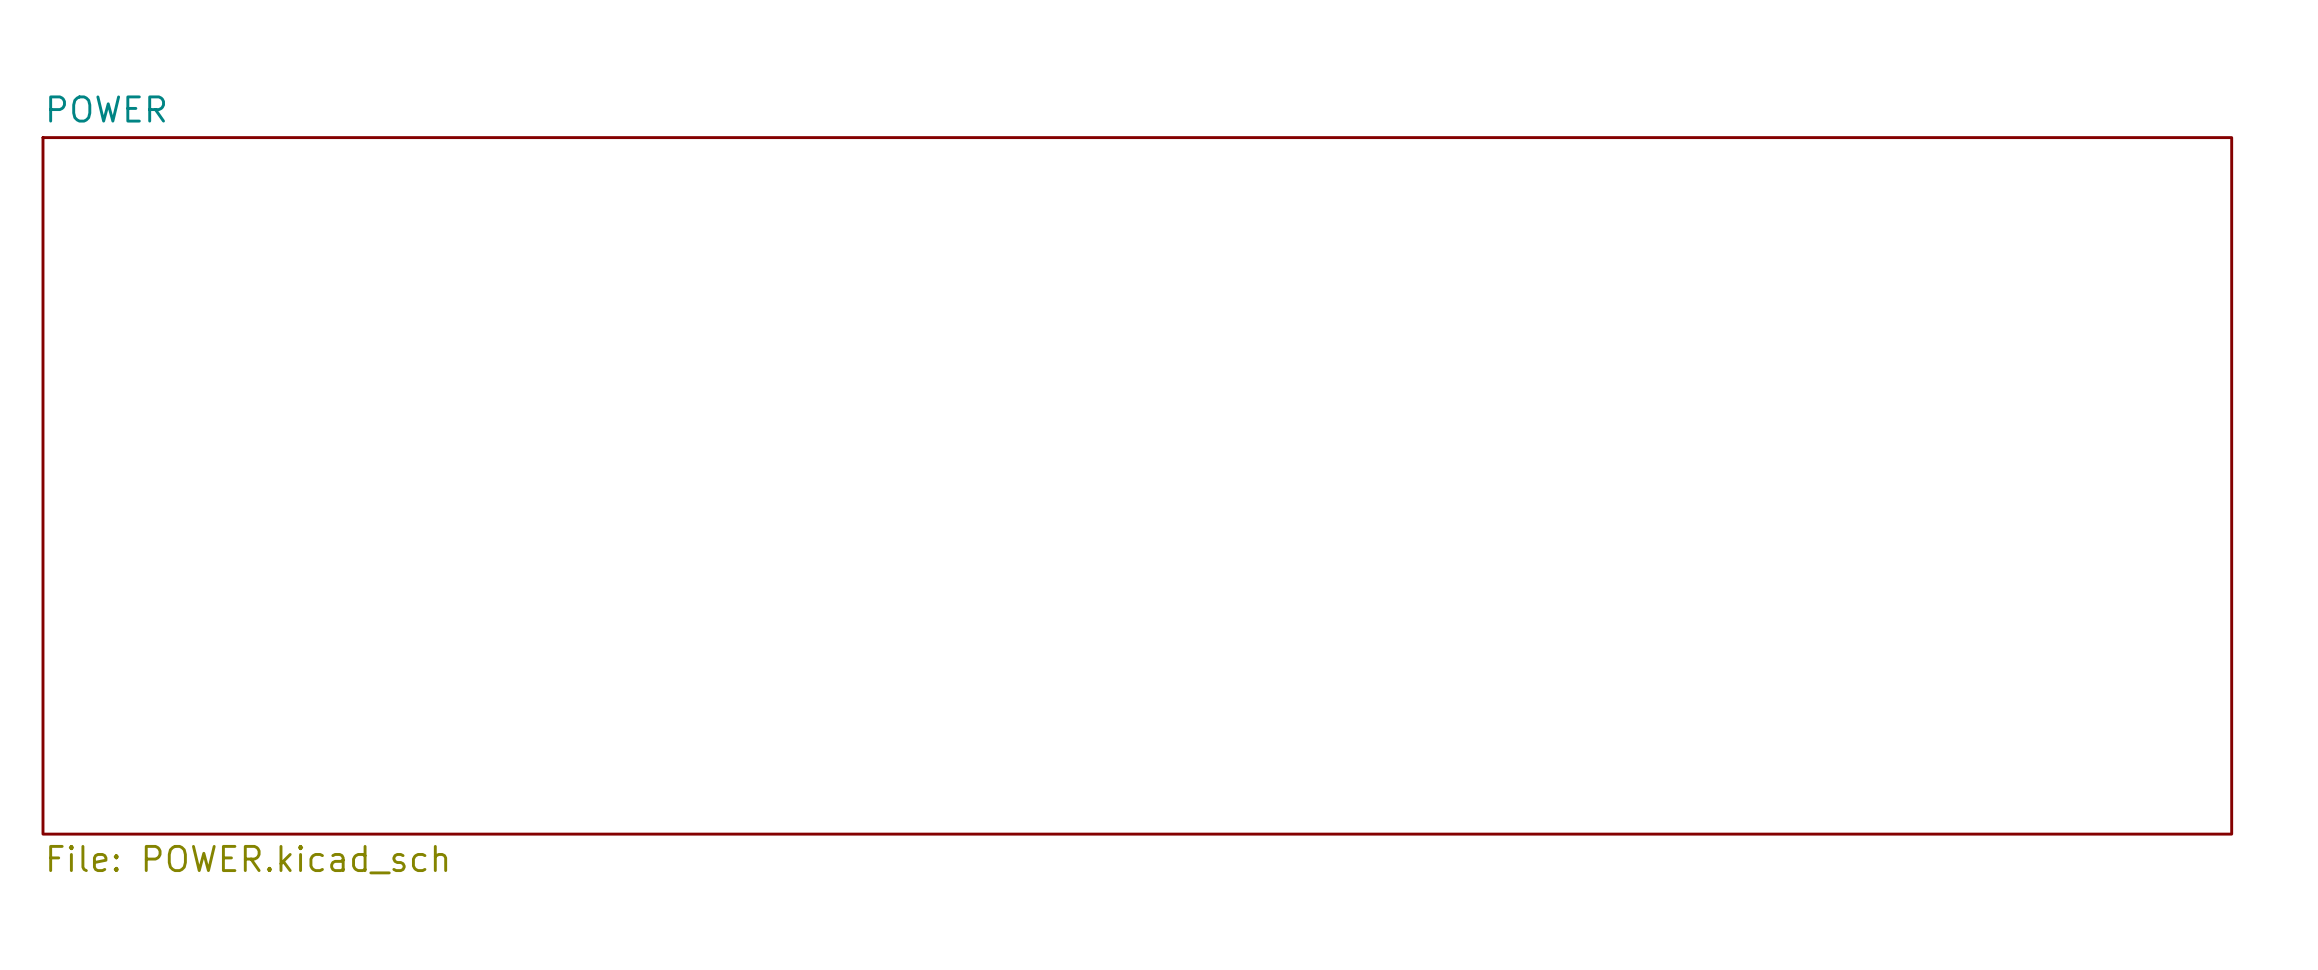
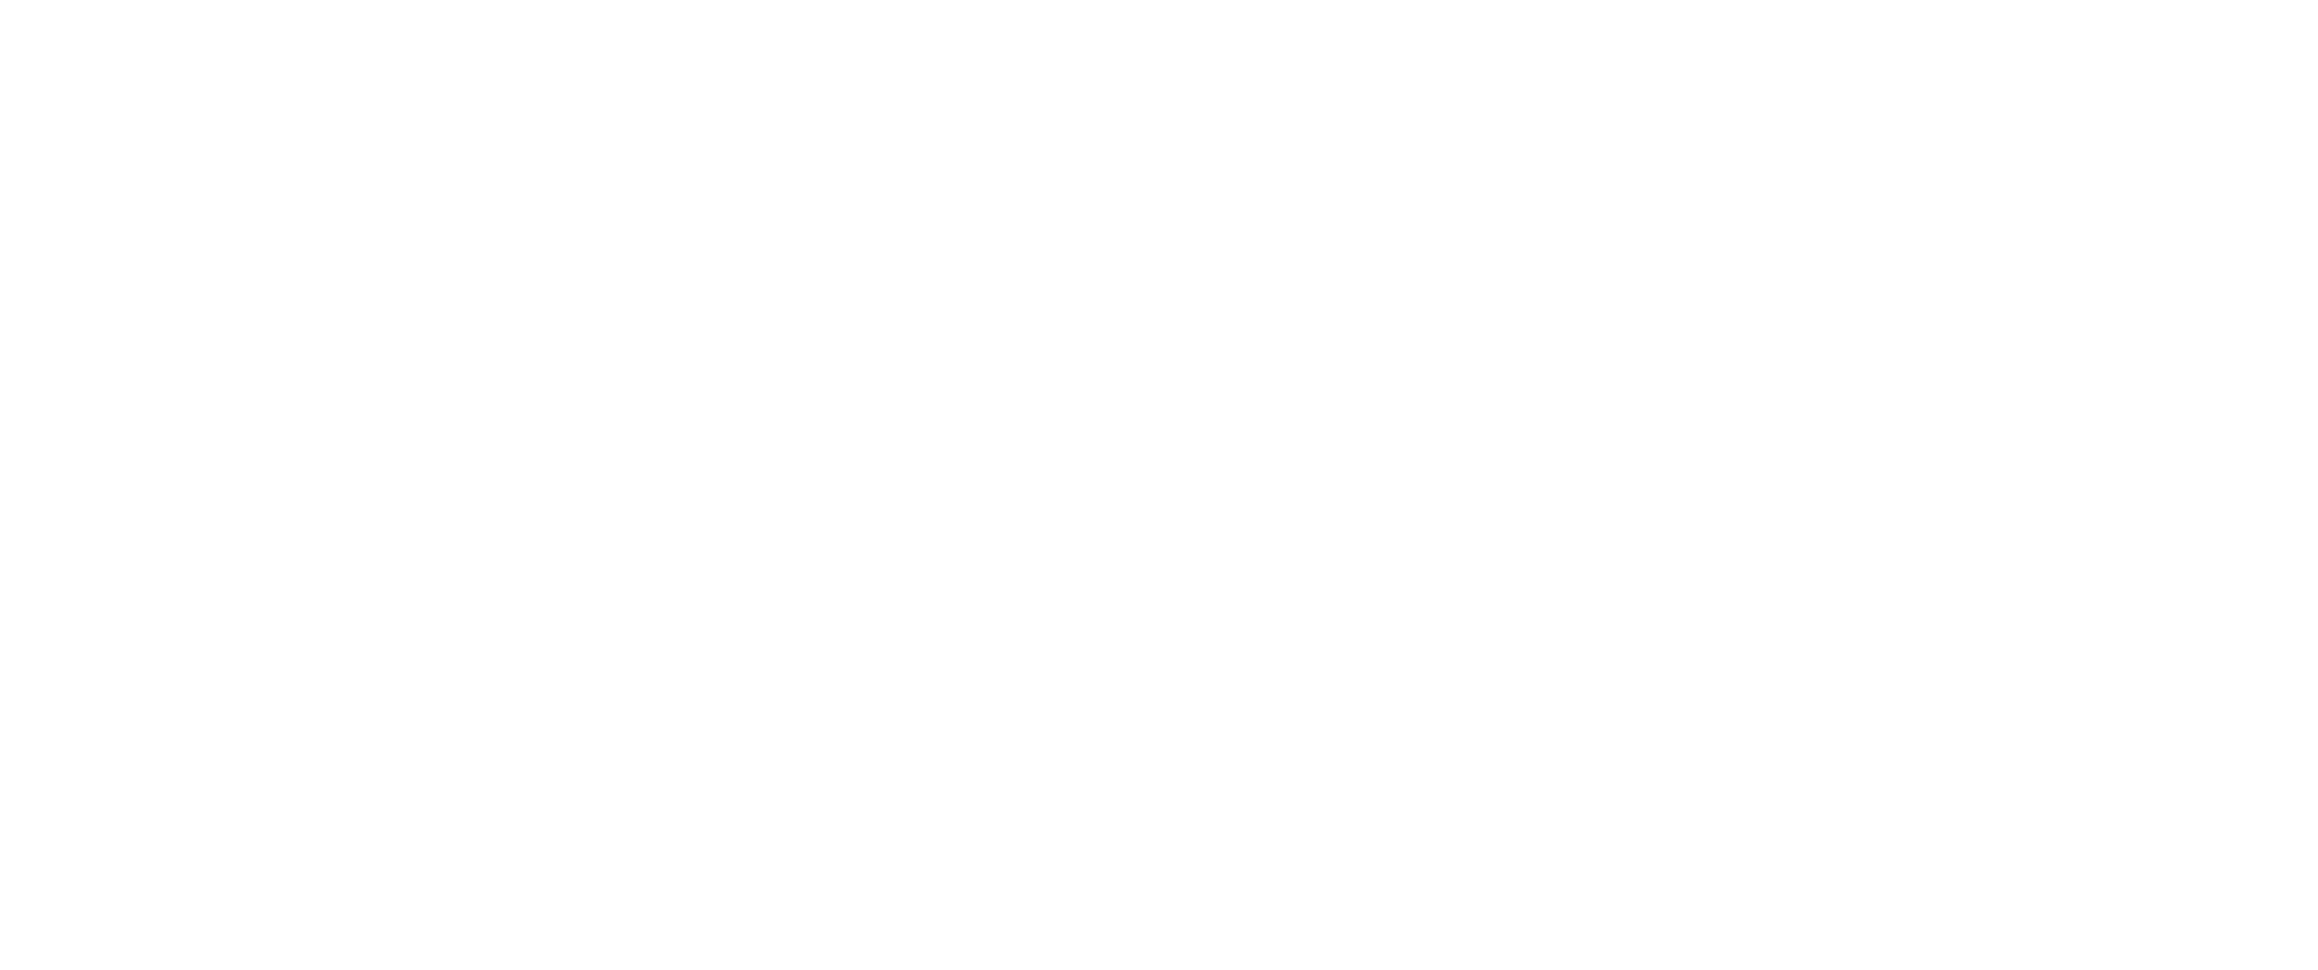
sheet POWER: File: POWER.kicad_sch (1137, 485) -> none

